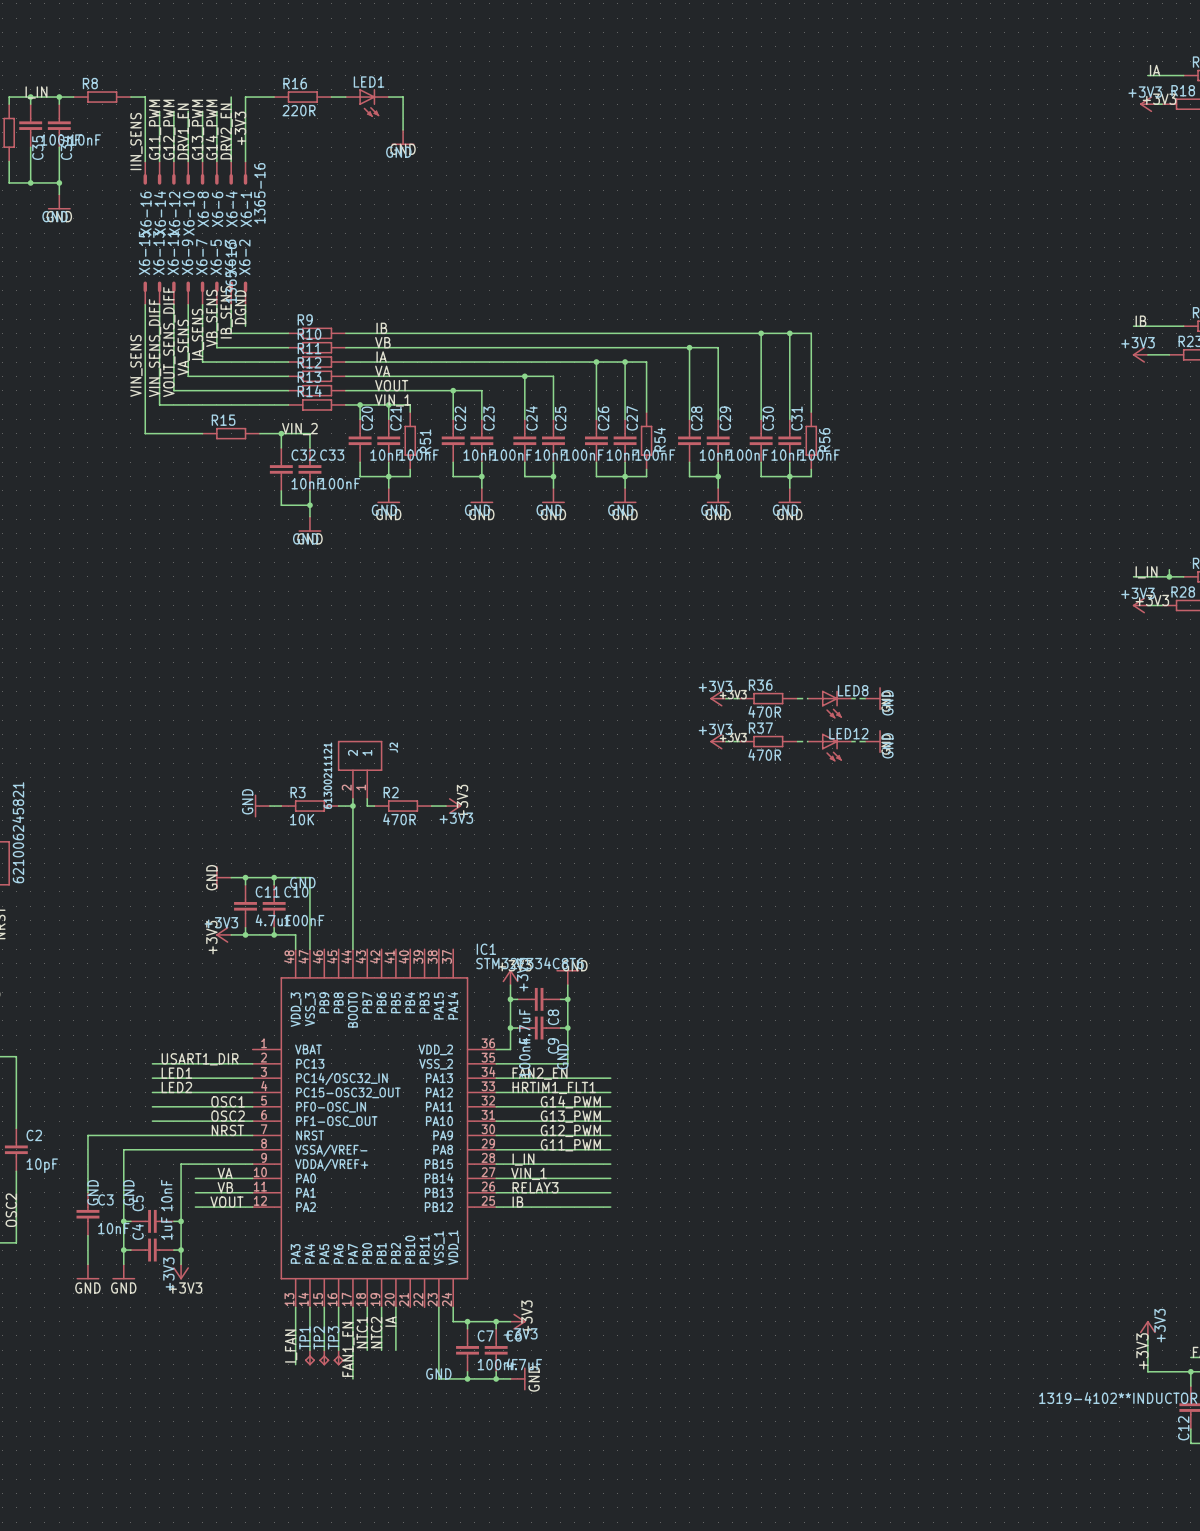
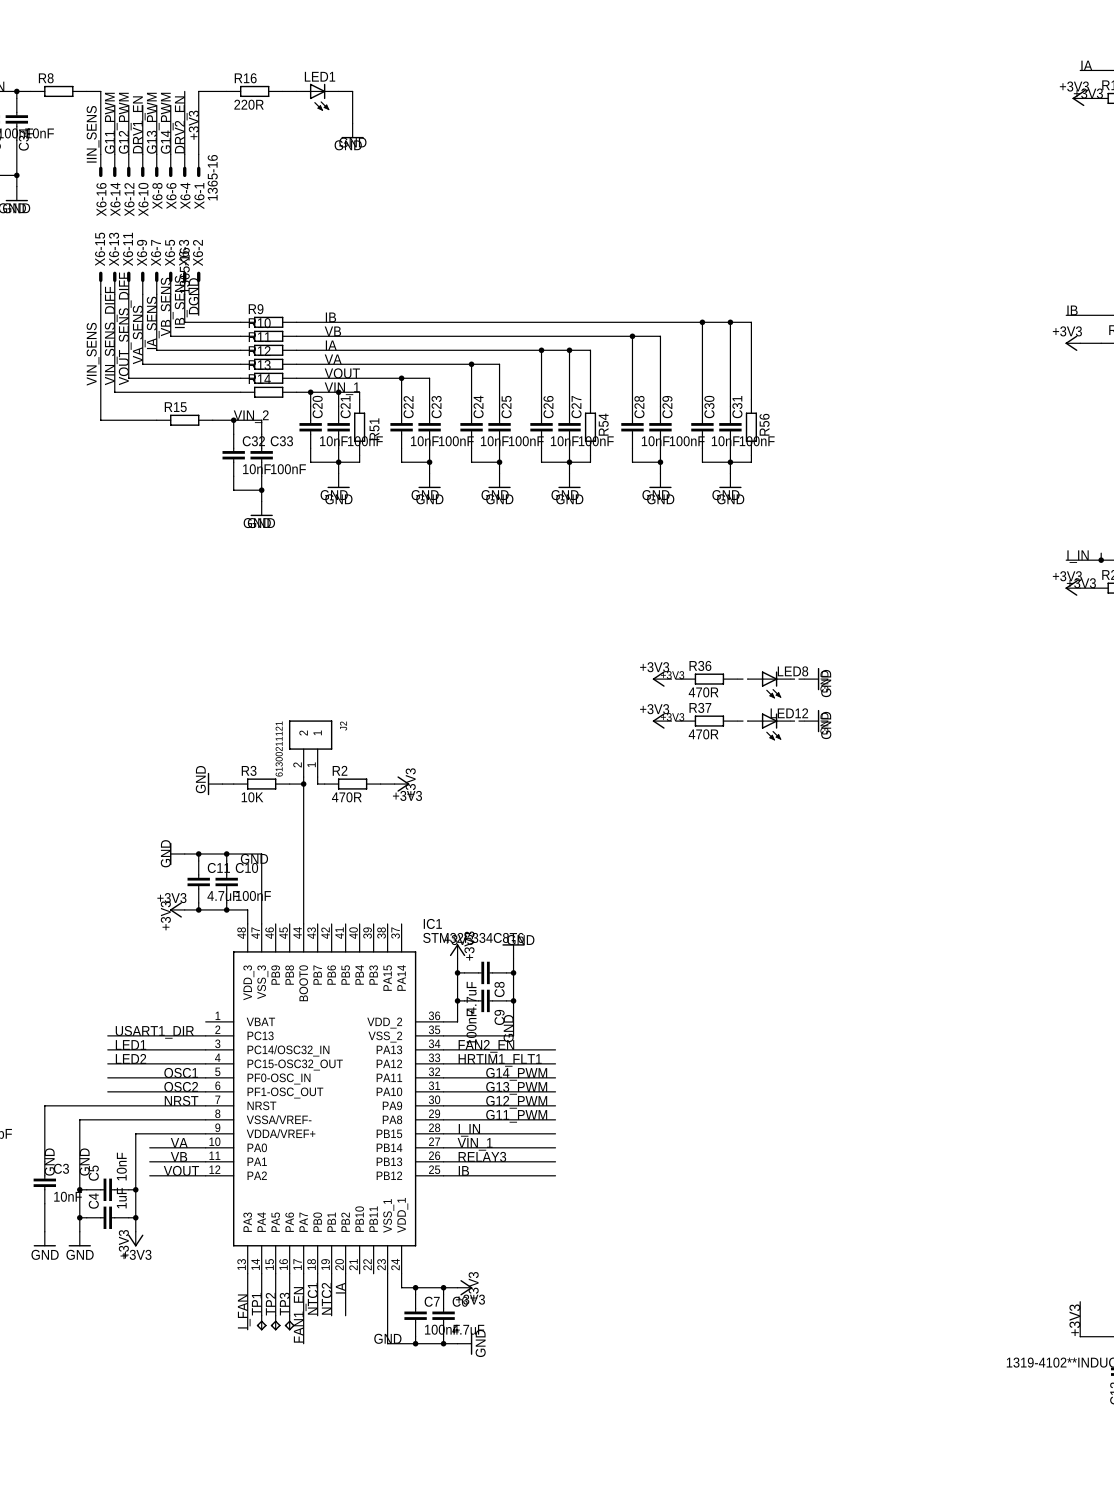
power symbol: +3V3 (1147, 1328) -> none

